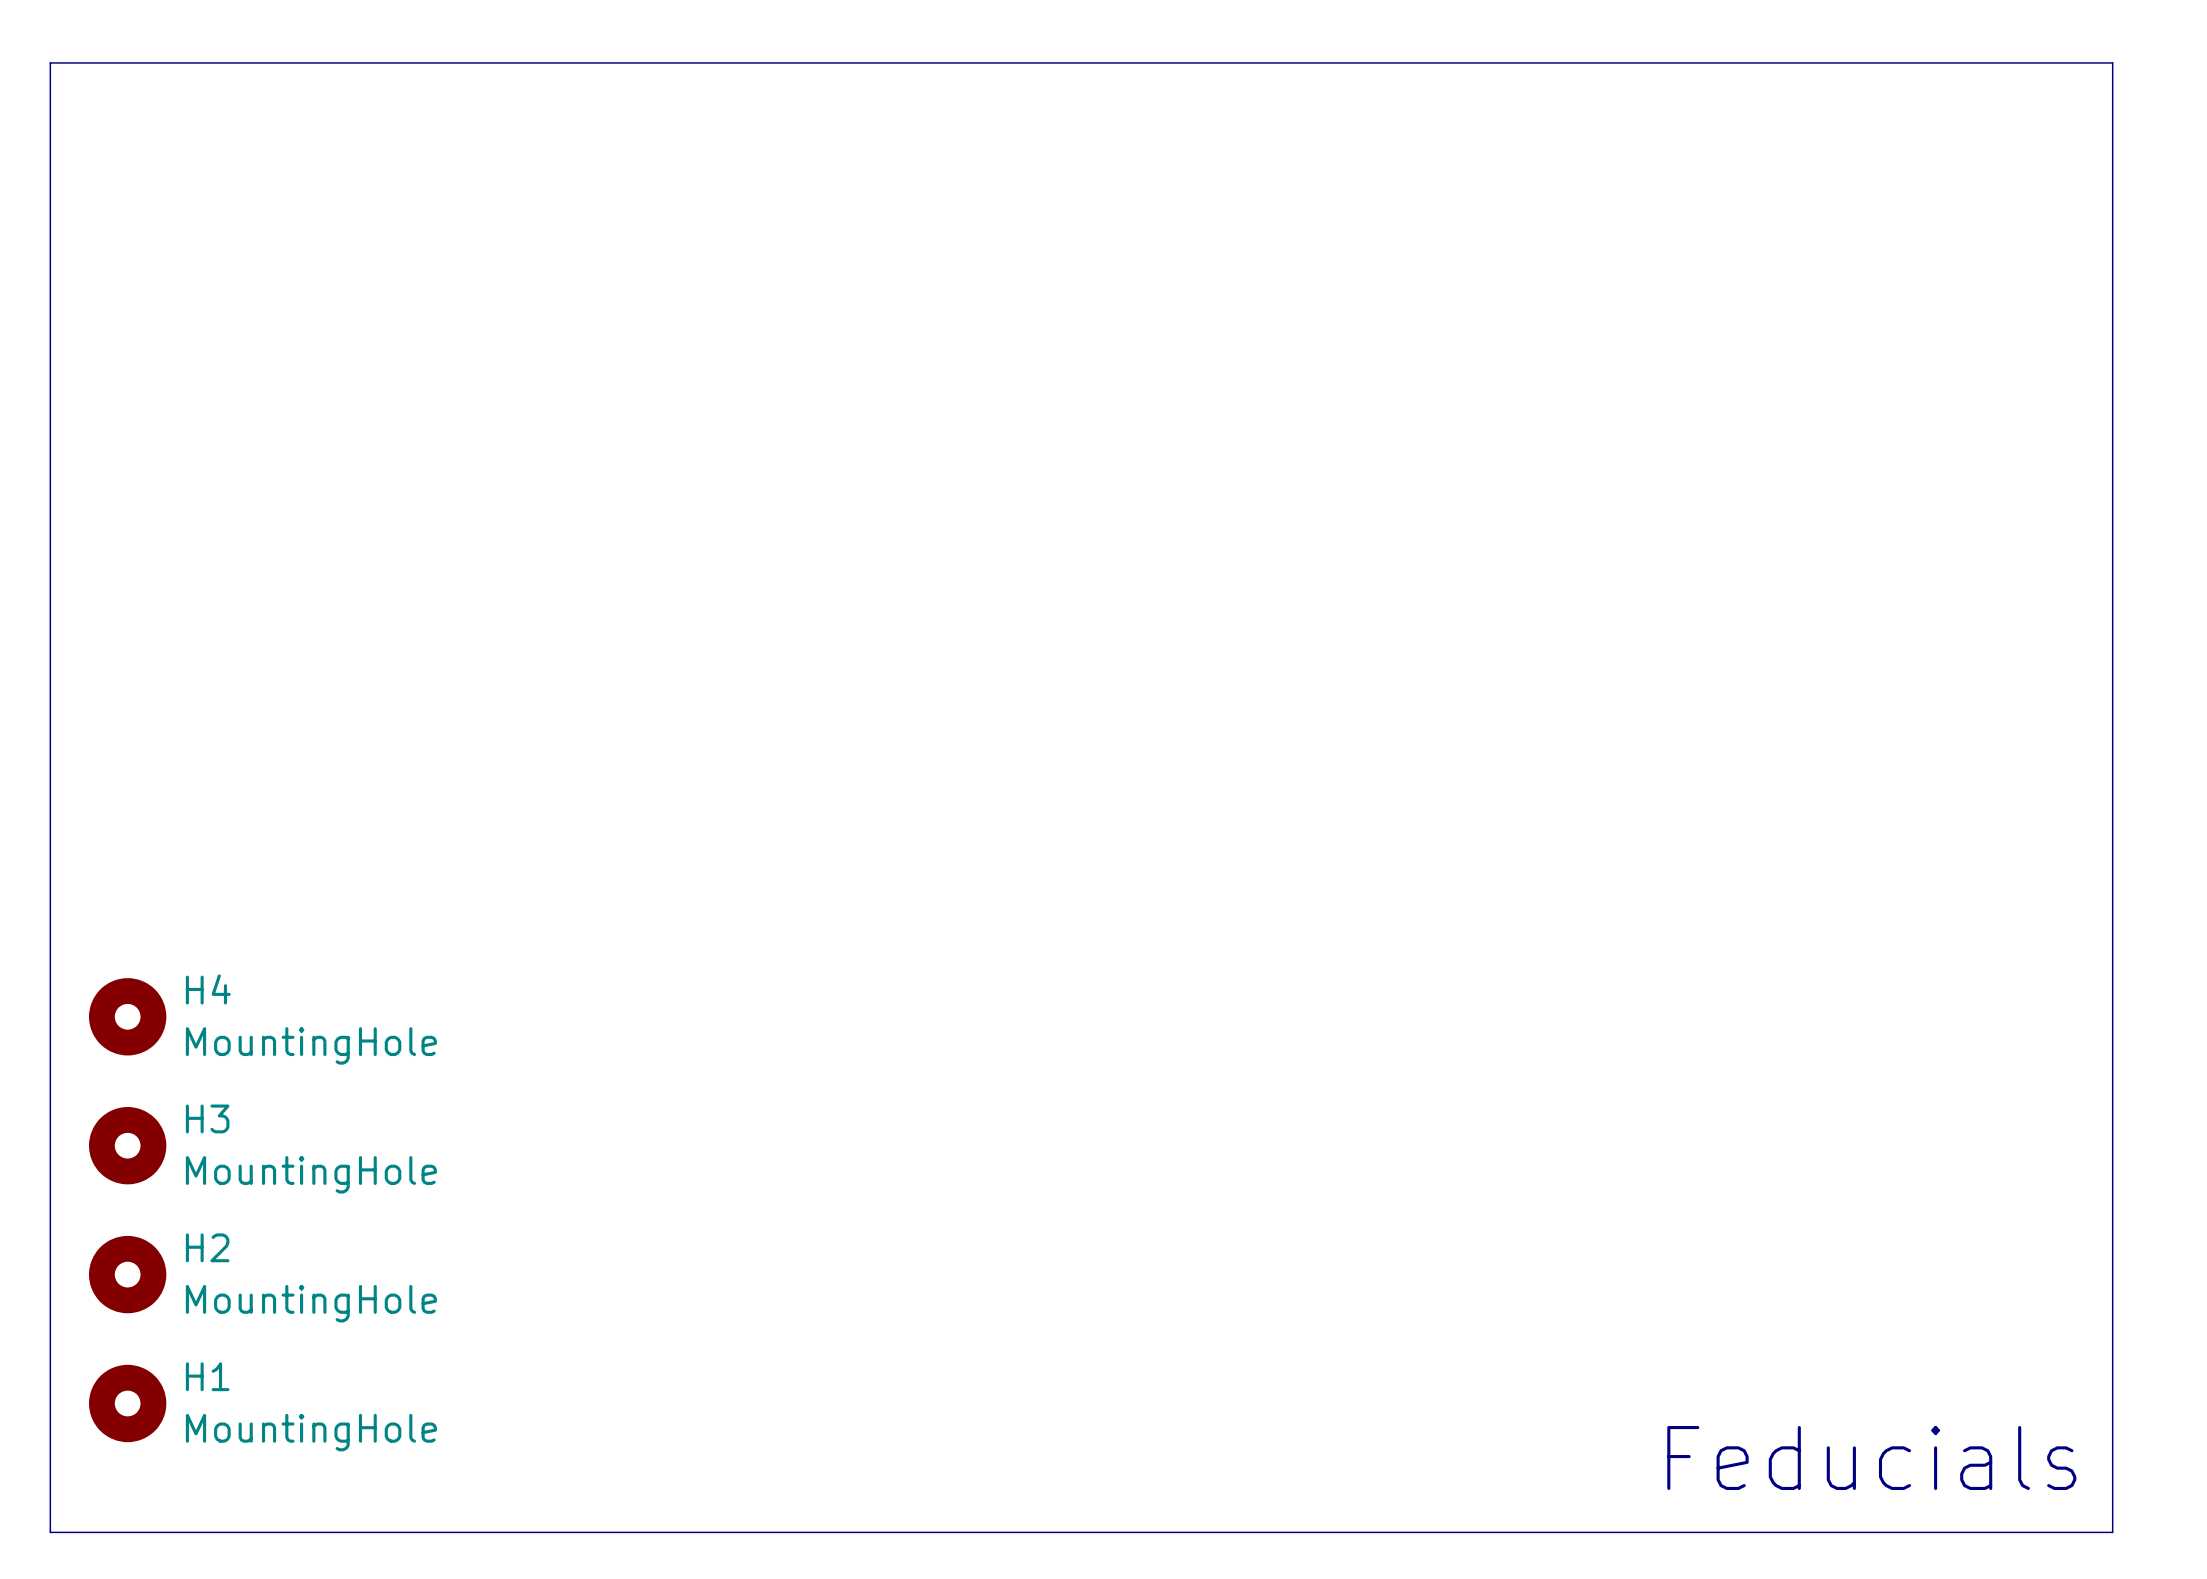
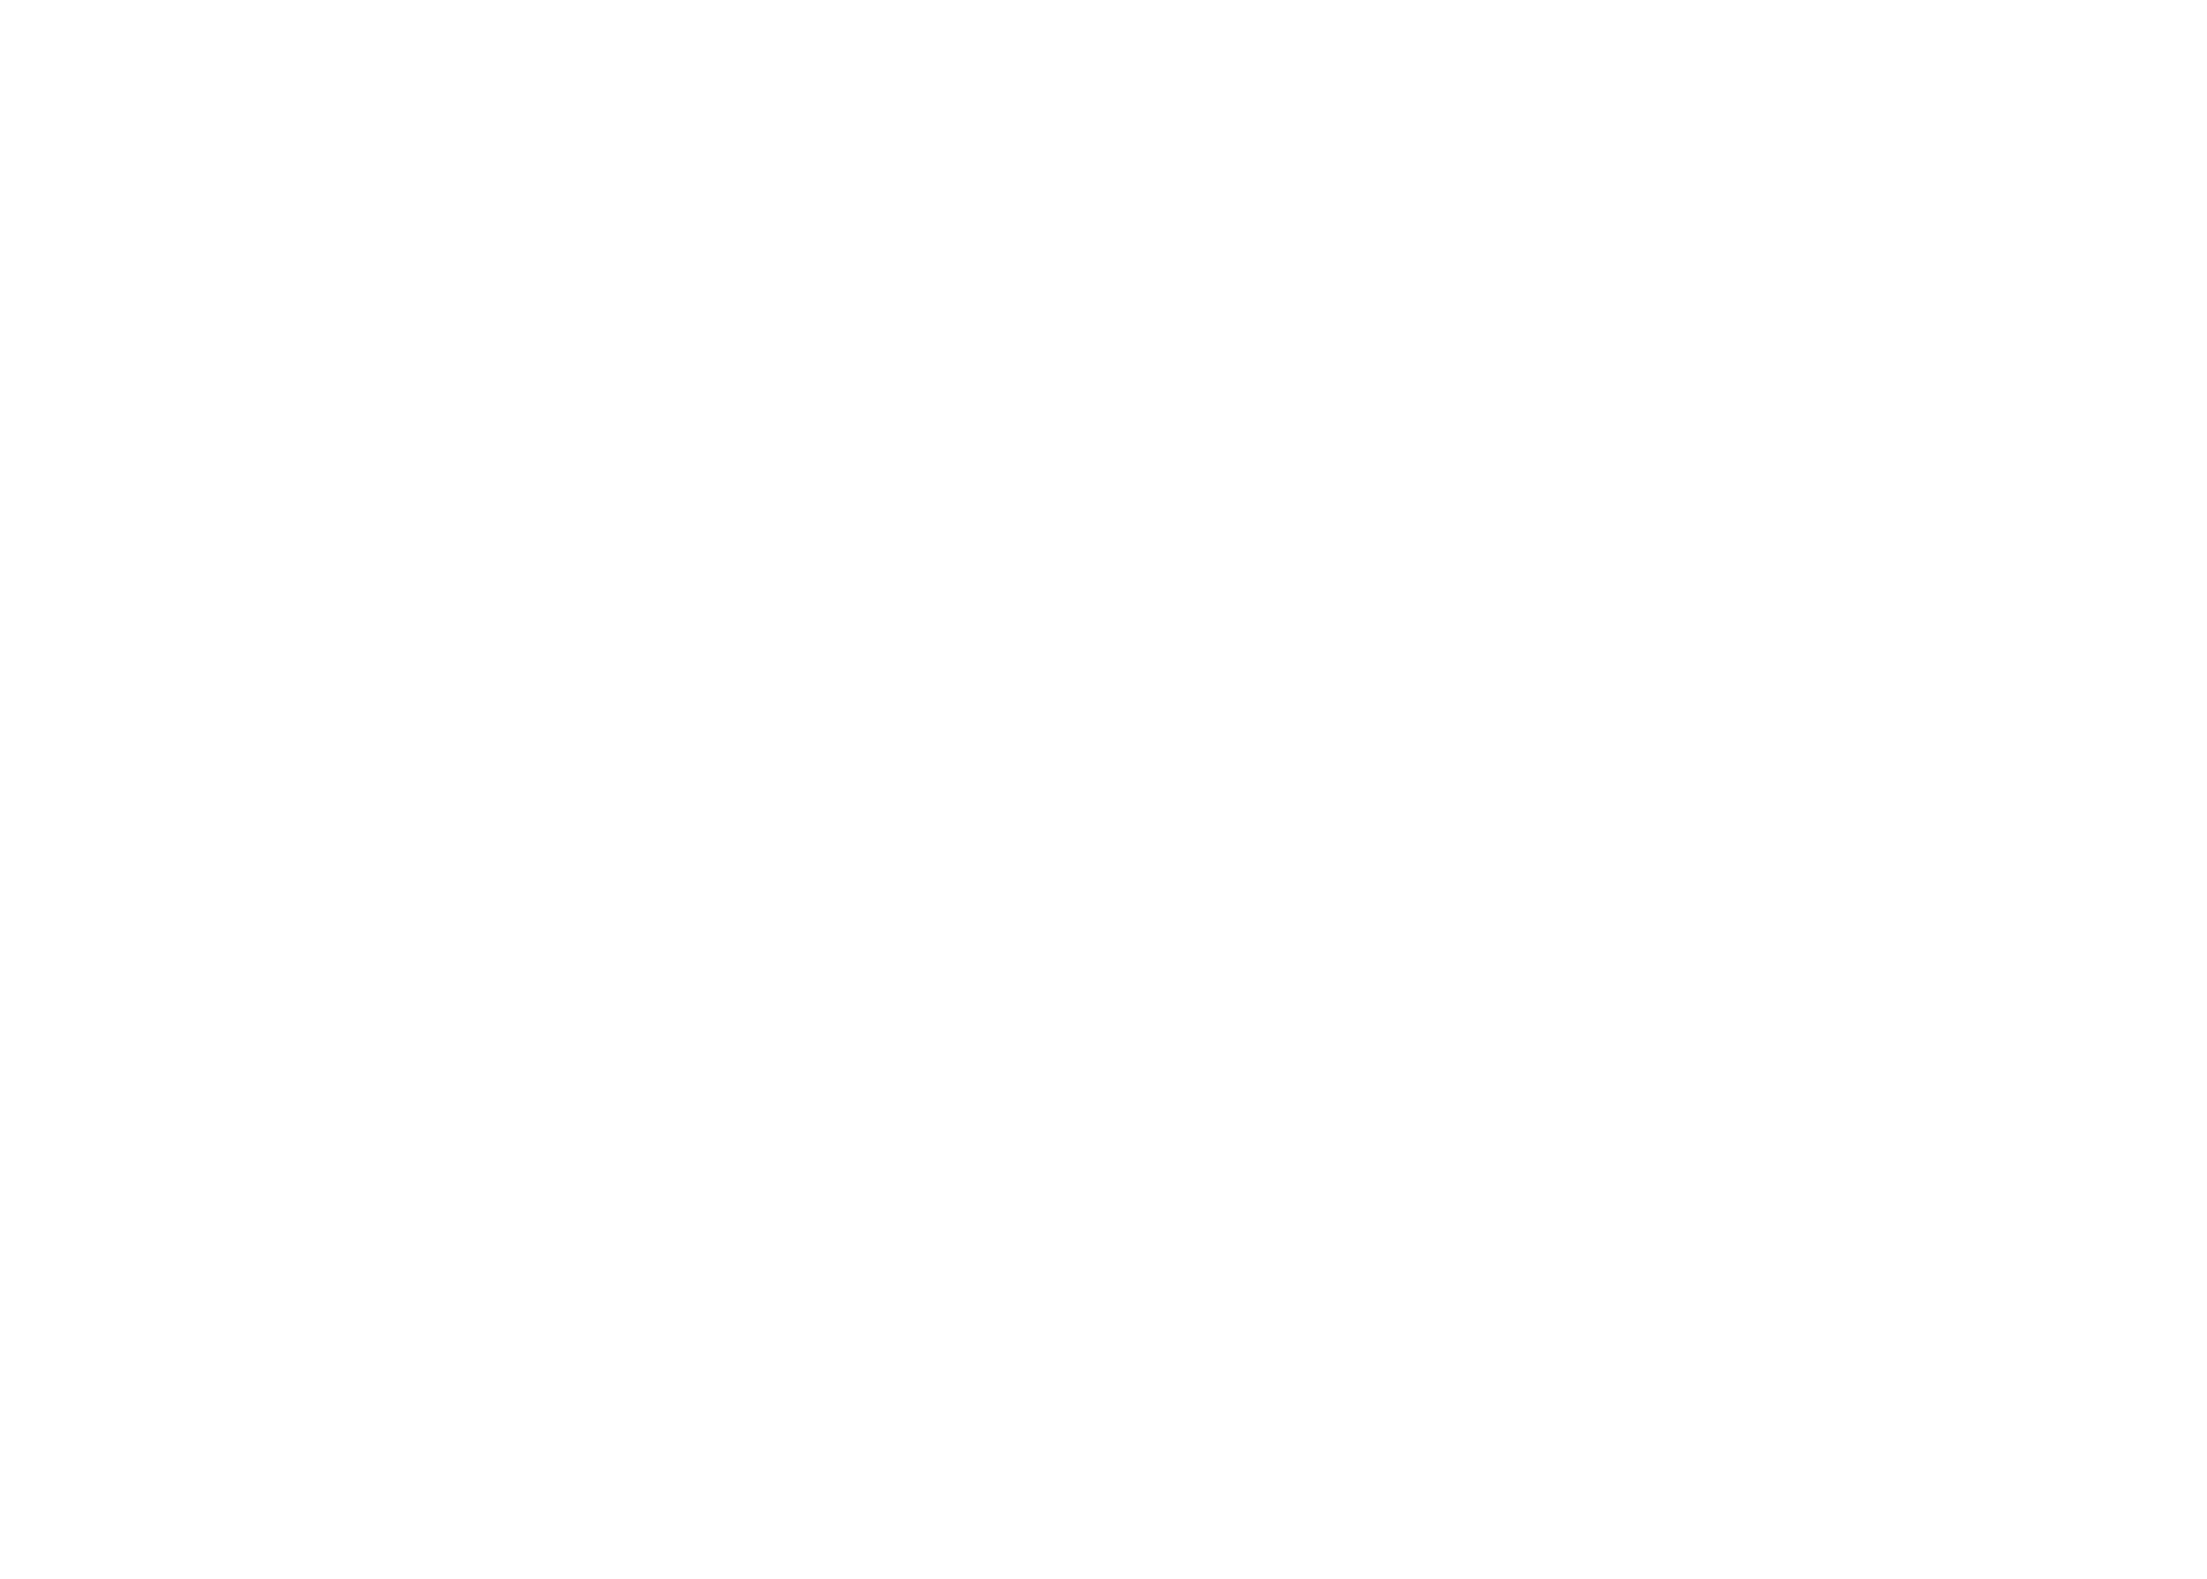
line: (50, 62) (2112, 62) (2112, 1532) (50, 1532) (50, 62) -> none
H4: MountingHole (127, 1016) -> none
H3: MountingHole (127, 1145) -> none
H2: MountingHole (127, 1274) -> none
H1: MountingHole (127, 1403) -> none
text: Feducials (1871, 1458) -> none

